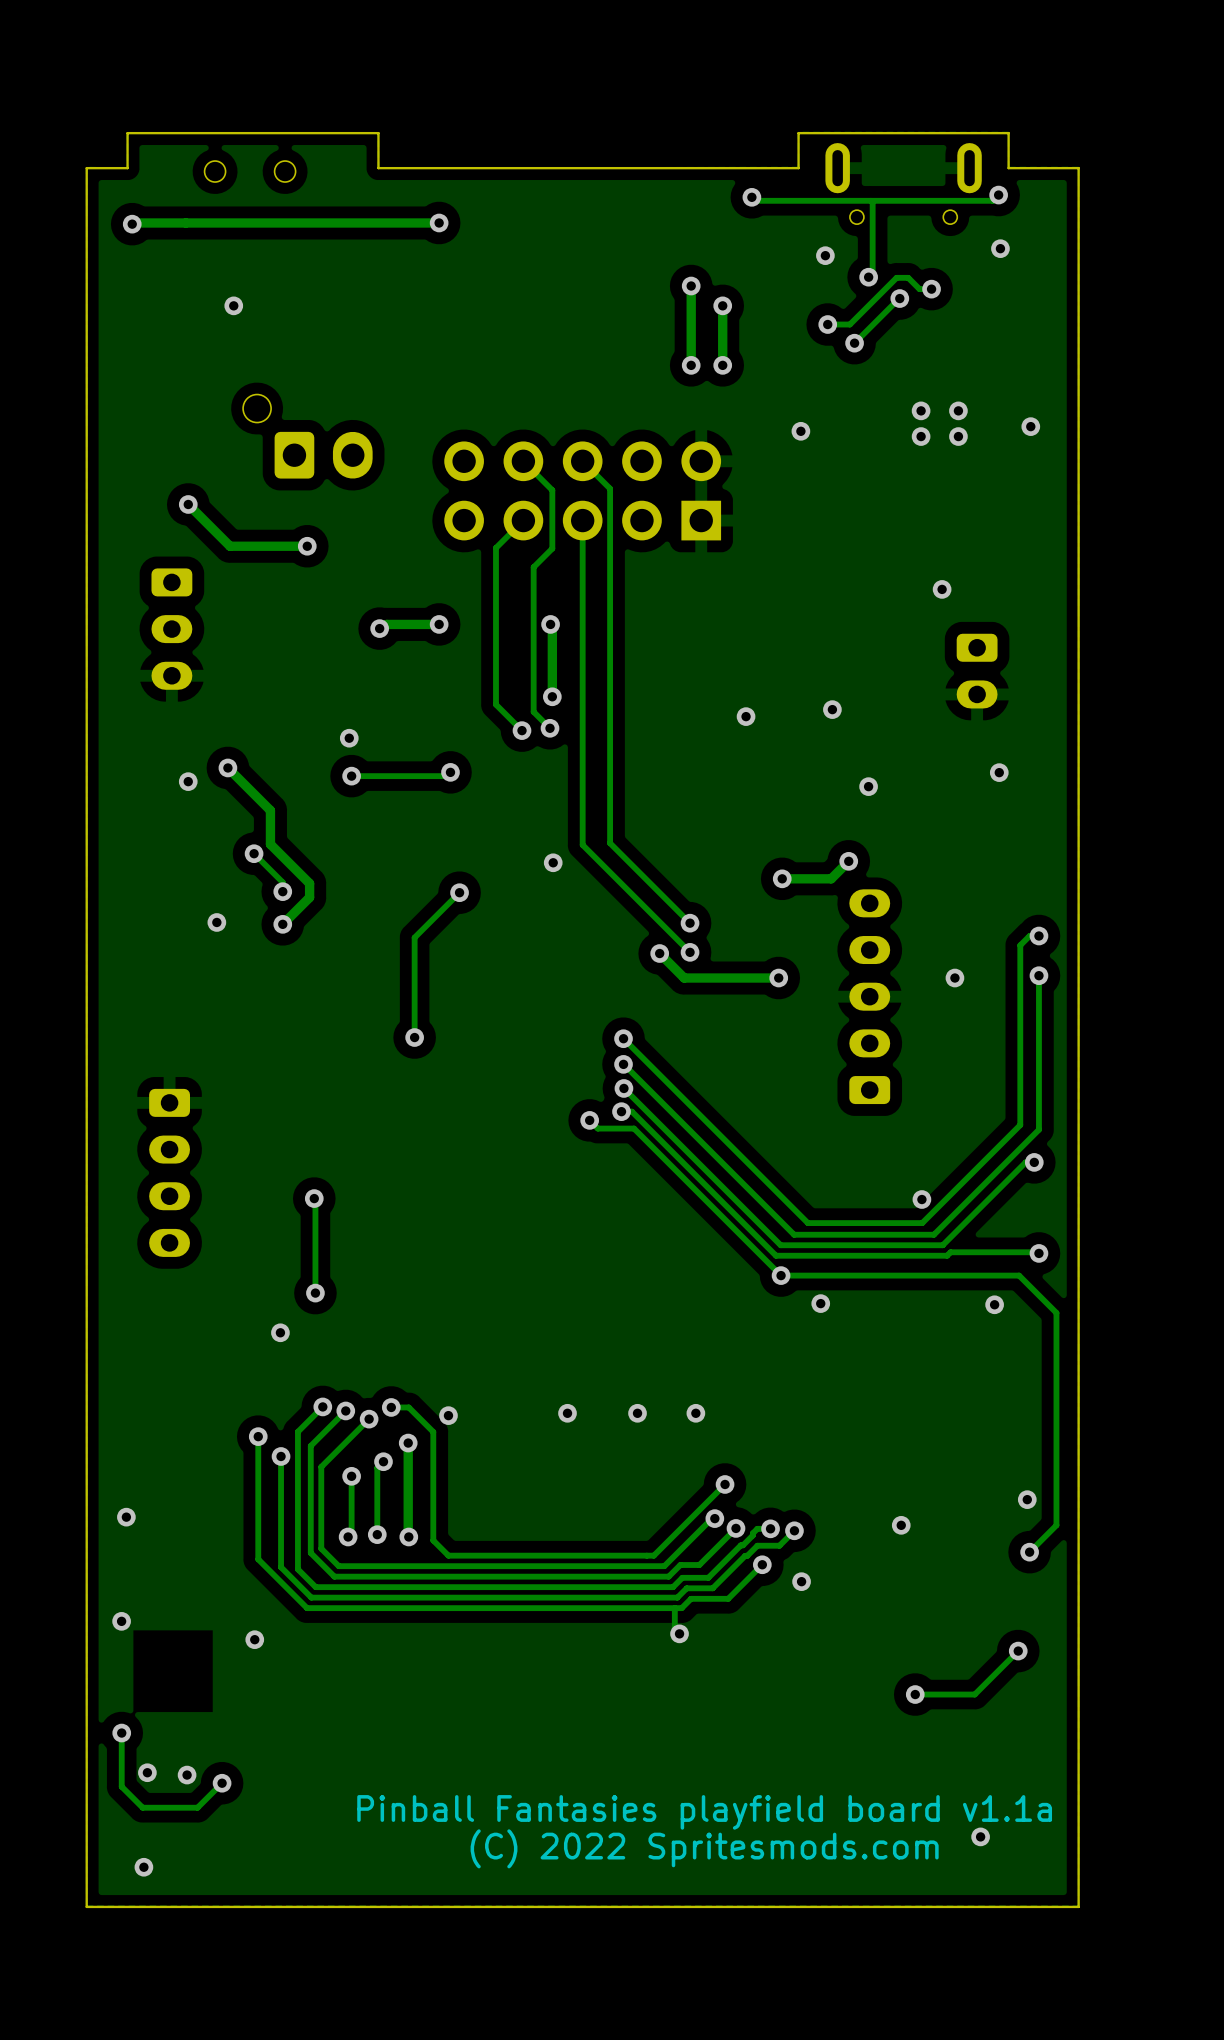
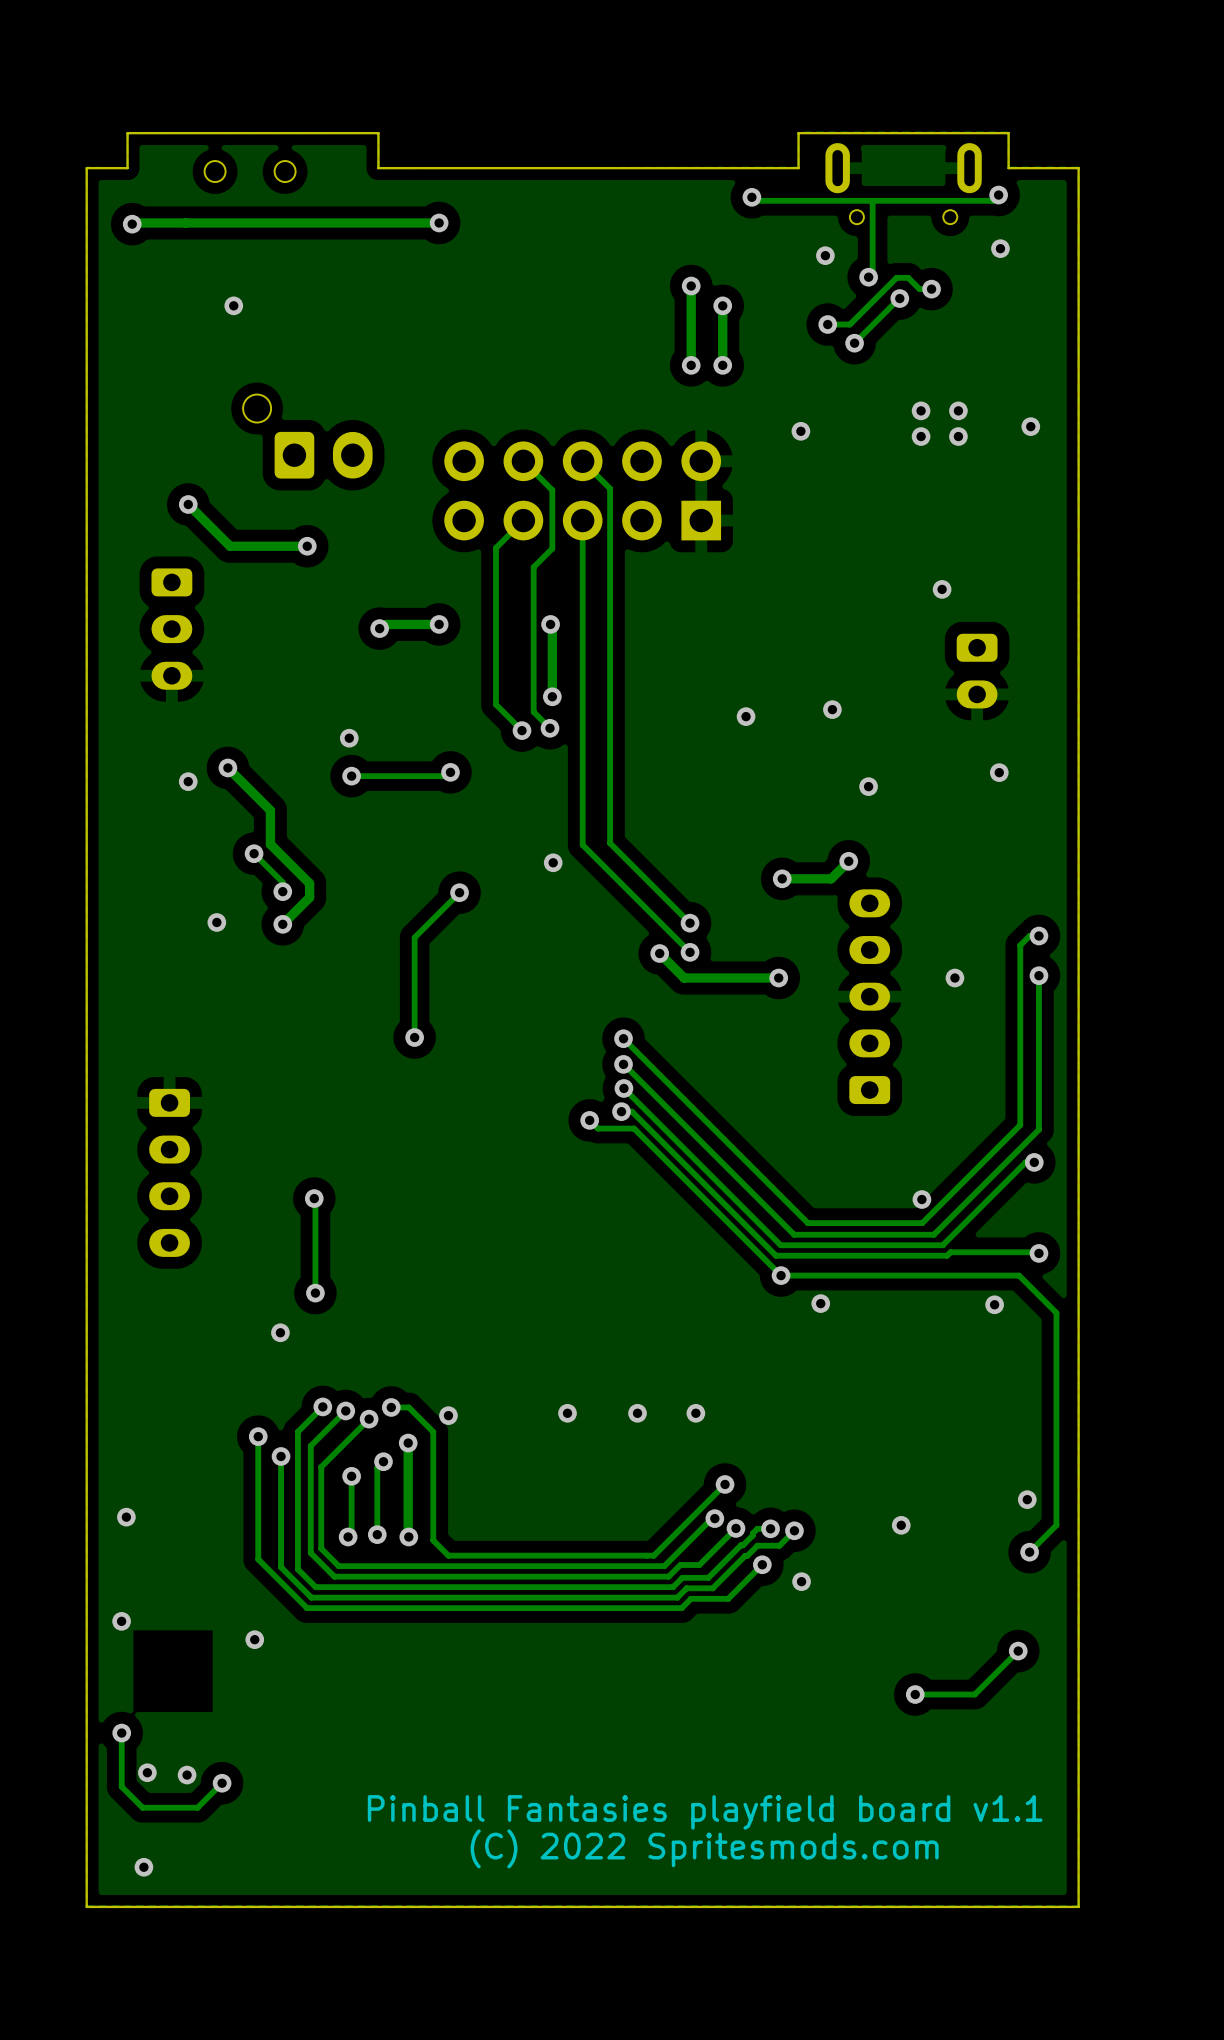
track: (674, 1608) (674, 1629) (679, 1633) -> none
via: (679, 1633) -> none
text: Pinball Fantasies playfield board v1.1a (704, 1812) -> Pinball Fantasies playfield board v1.1 (705, 1812)
via: (980, 1836) -> none

